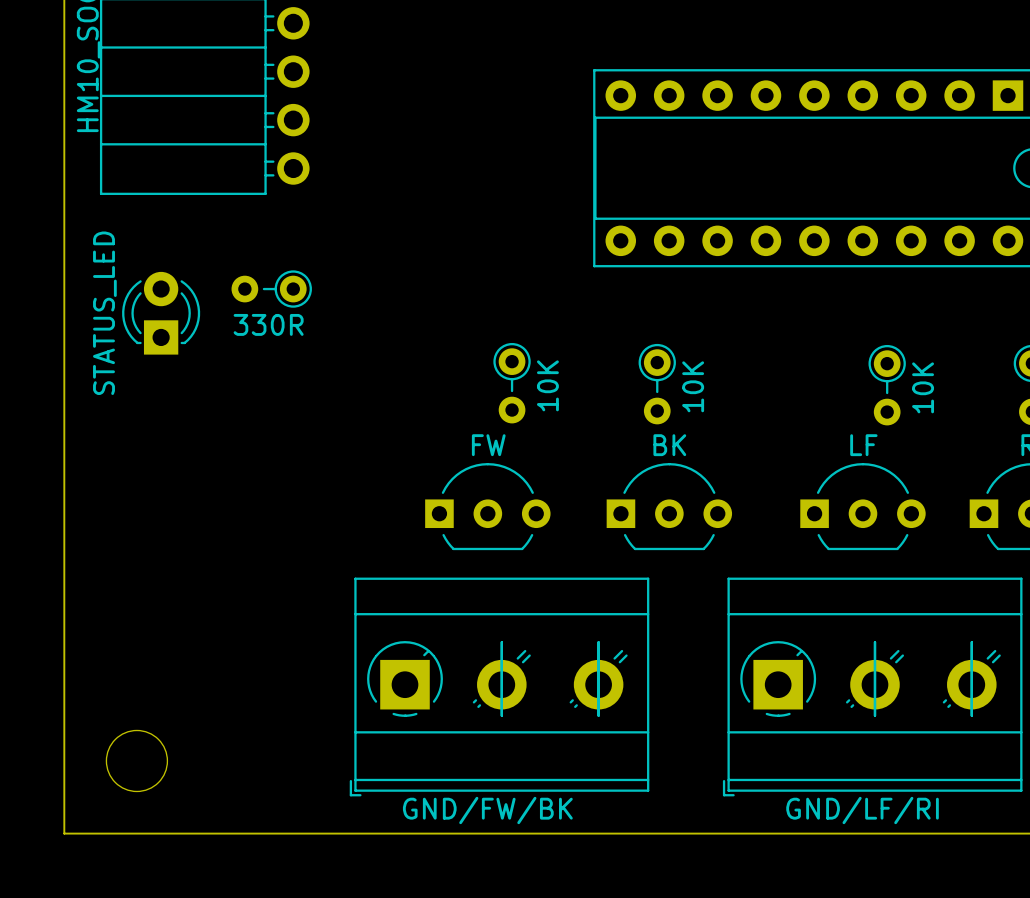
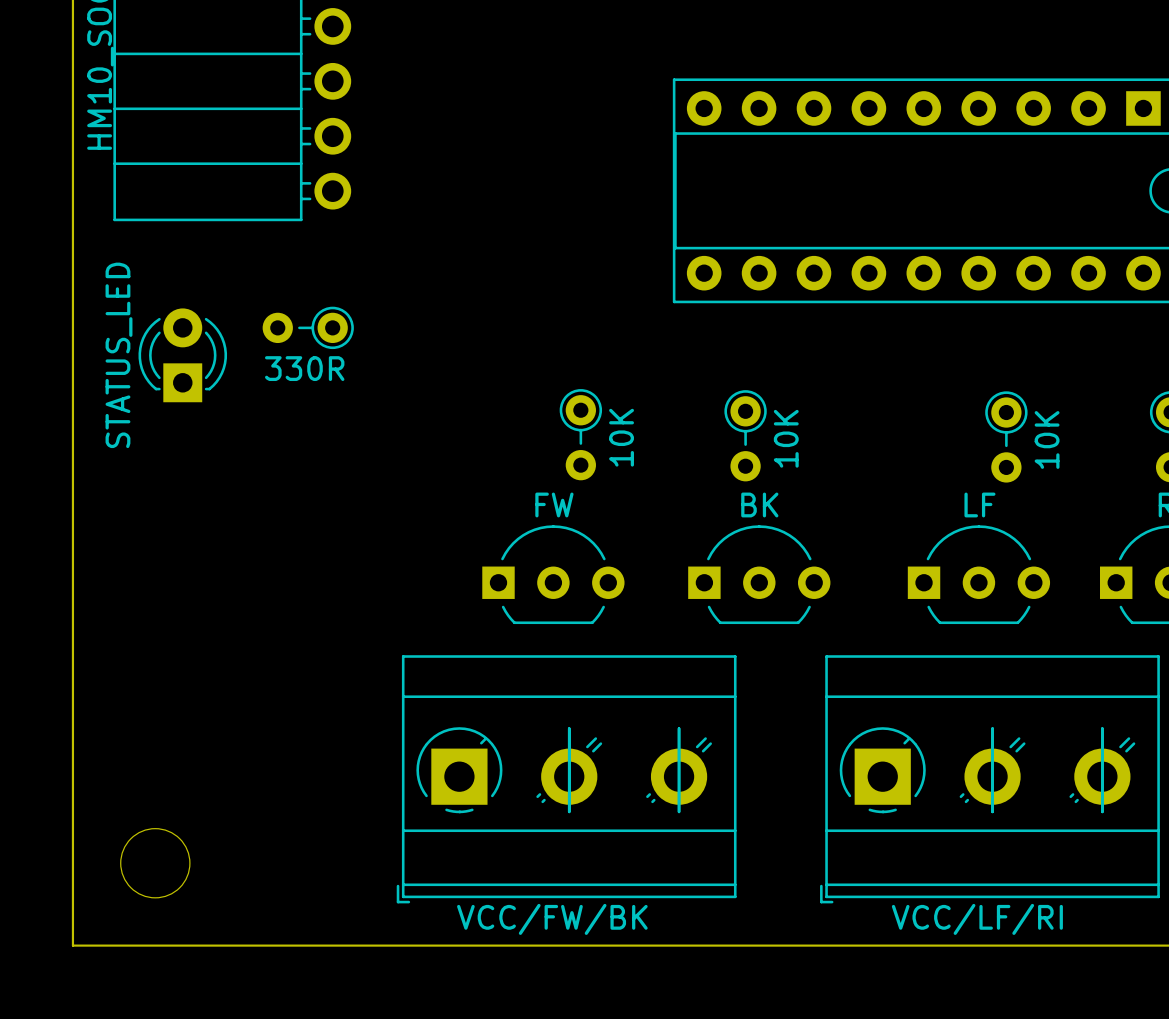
GND/FW/BK name: GND/FW/BK (487, 810) -> VCC/FW/BK (552, 919)
GND/LF/RI name: GND/LF/RI (862, 810) -> VCC/LF/RI (977, 919)

